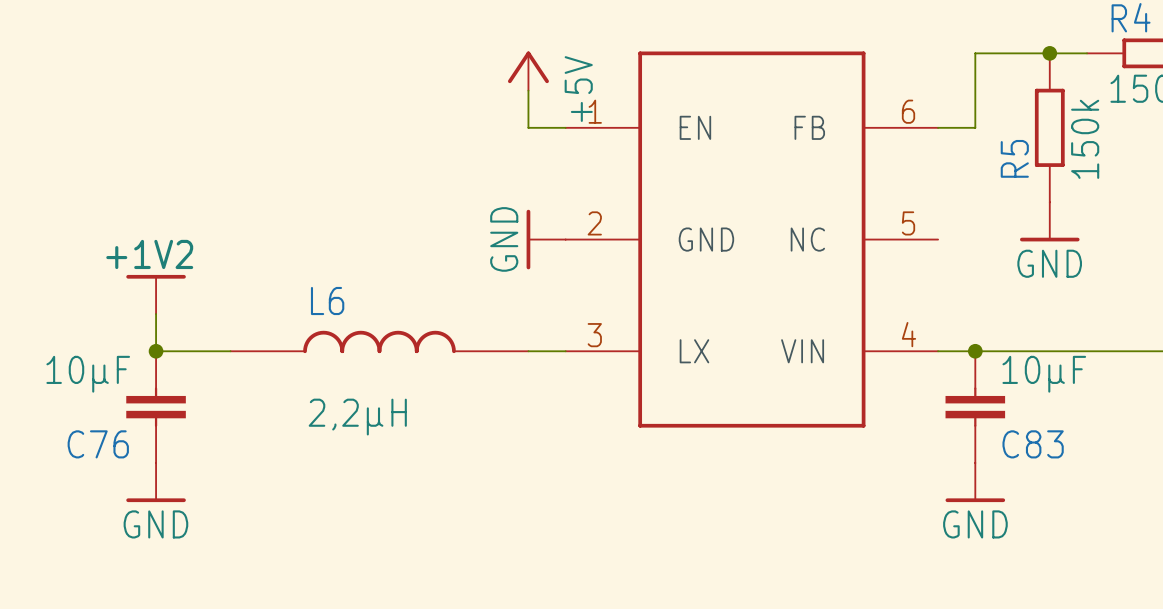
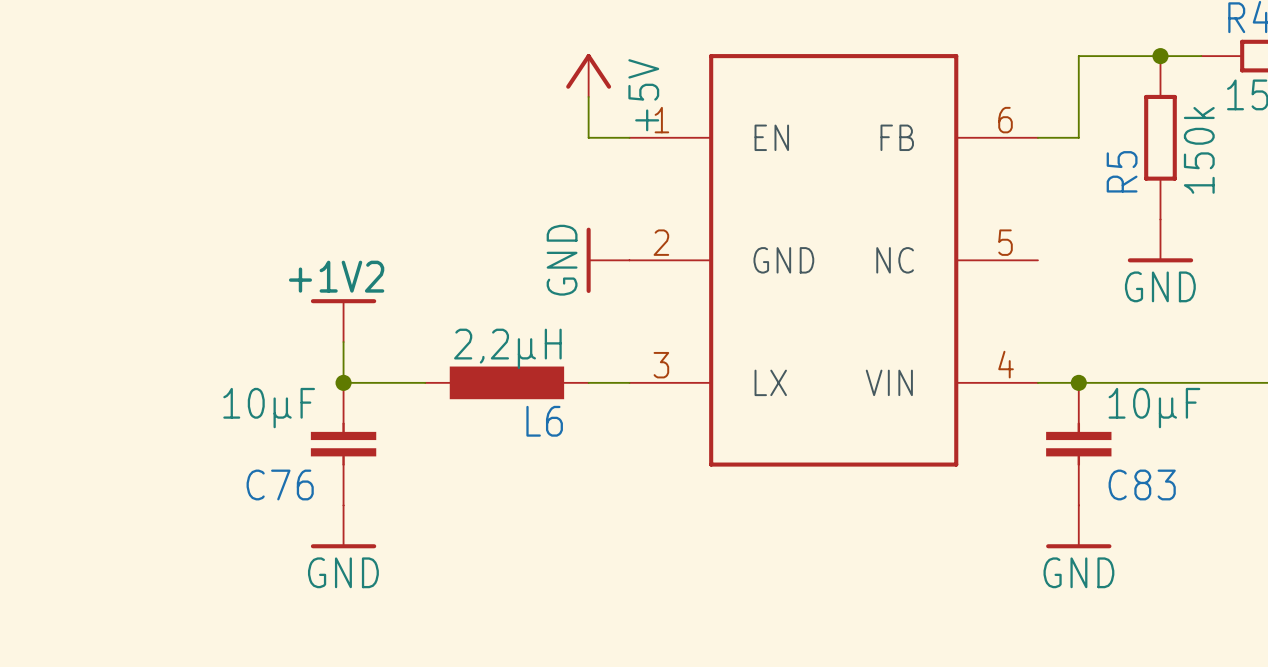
power symbol position: +1V2 (156, 294) -> +1V2 (343, 320)
L6 name position: L6 (327, 301) -> L6 (544, 421)
wire: (156, 314) (156, 351) (230, 351) -> (343, 342) (343, 382) (425, 382)
L6 symbol: [230, 330, 529, 354] -> [425, 366, 589, 400]
junction: (156, 351) -> none
junction: none -> (343, 382)
C76 position: (156, 407) -> (343, 444)
L6 value position: 2,2µH (357, 417) -> 2,2µH (507, 348)
power symbol position: GND (156, 482) -> GND (343, 526)

